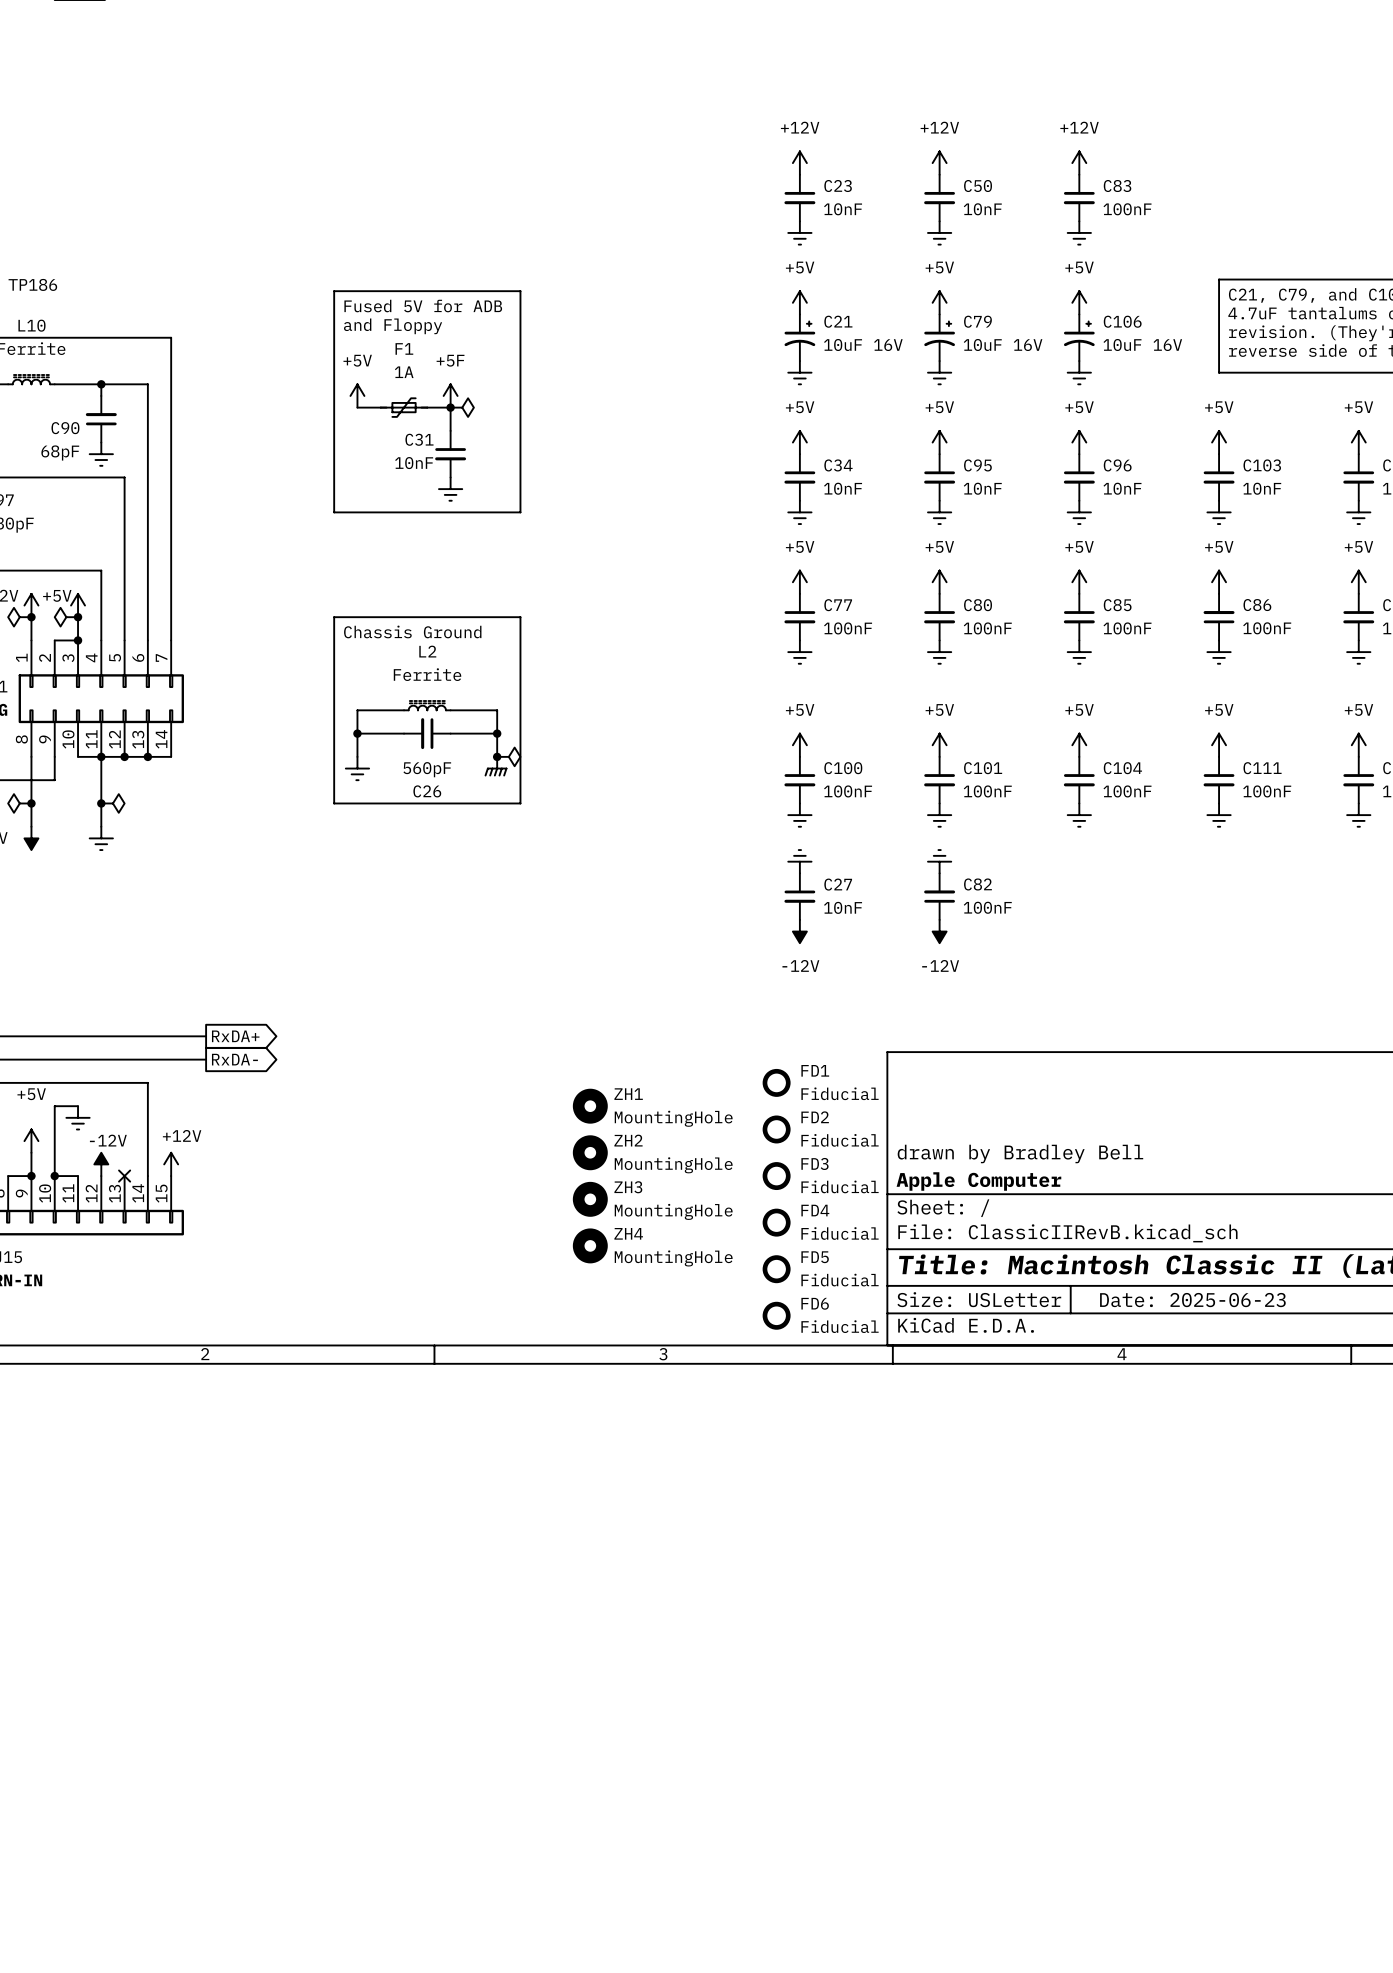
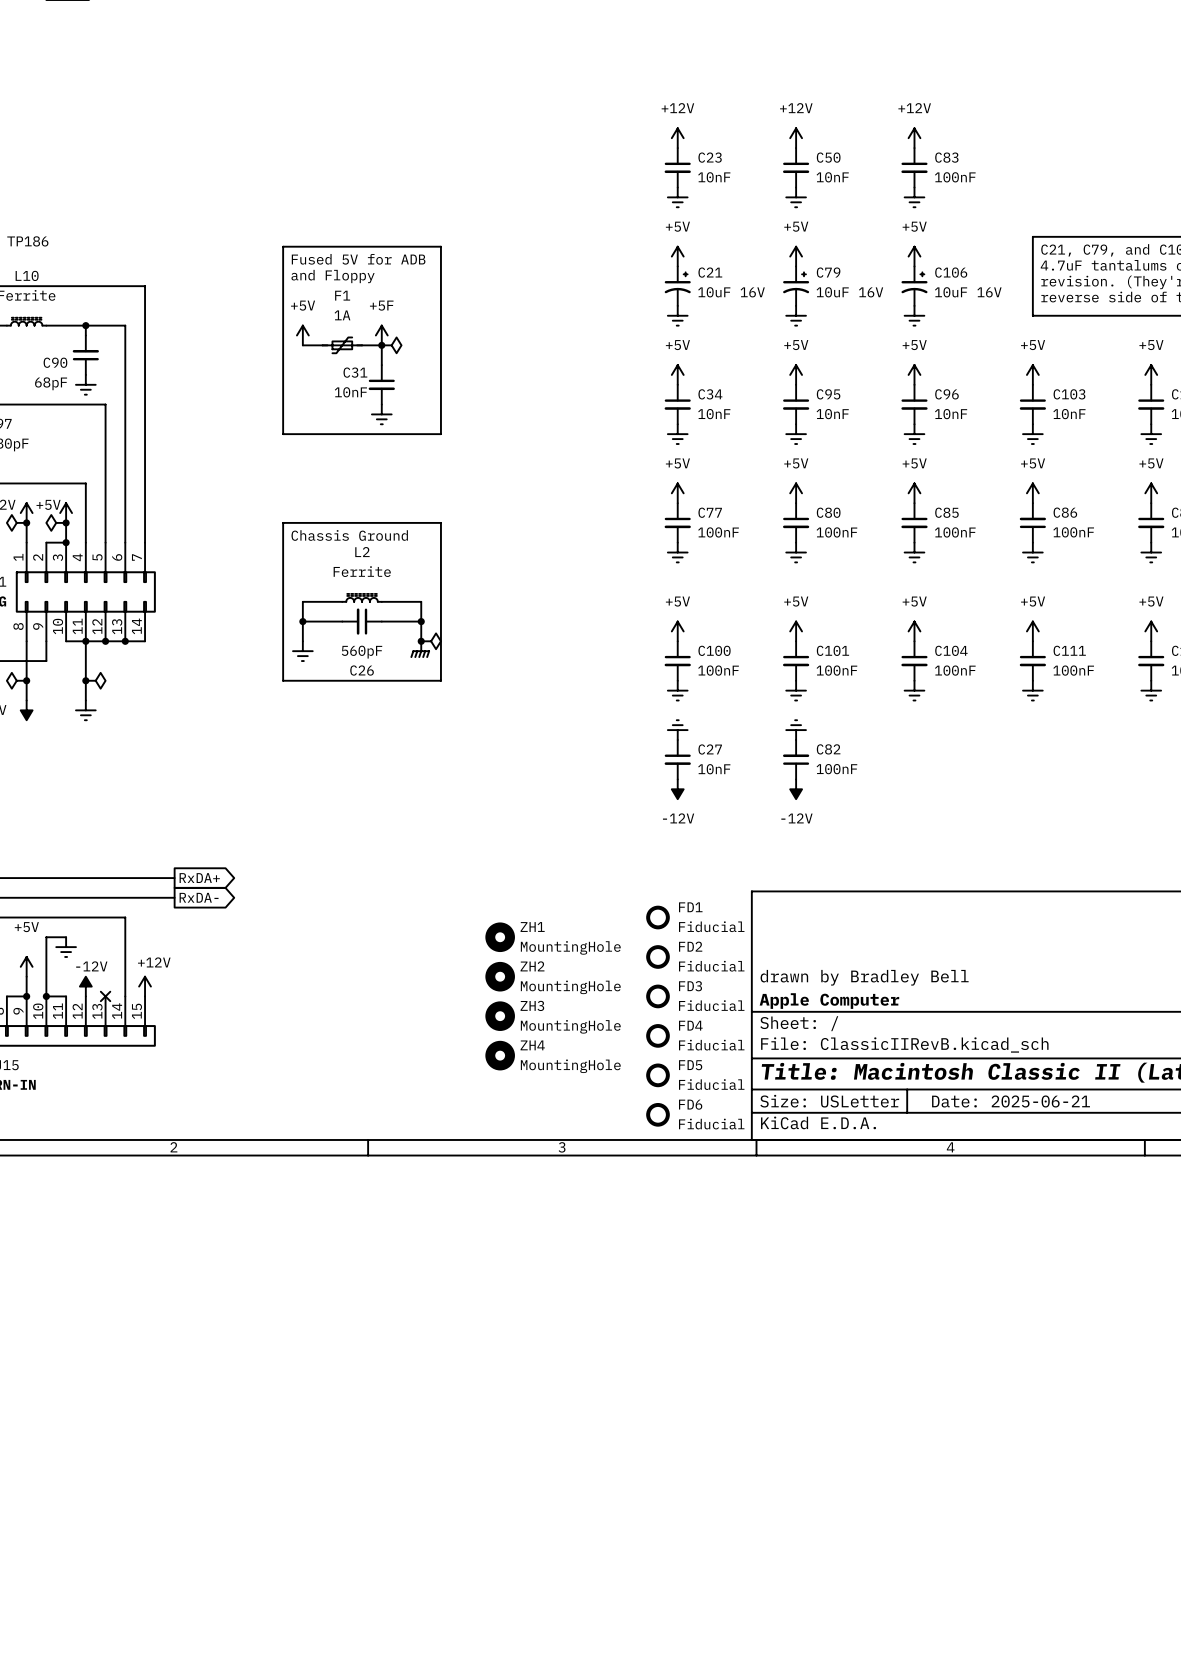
title block: Date: 2025-06-23 (1192, 1300) -> Date: 2025-06-21 (1011, 1101)

